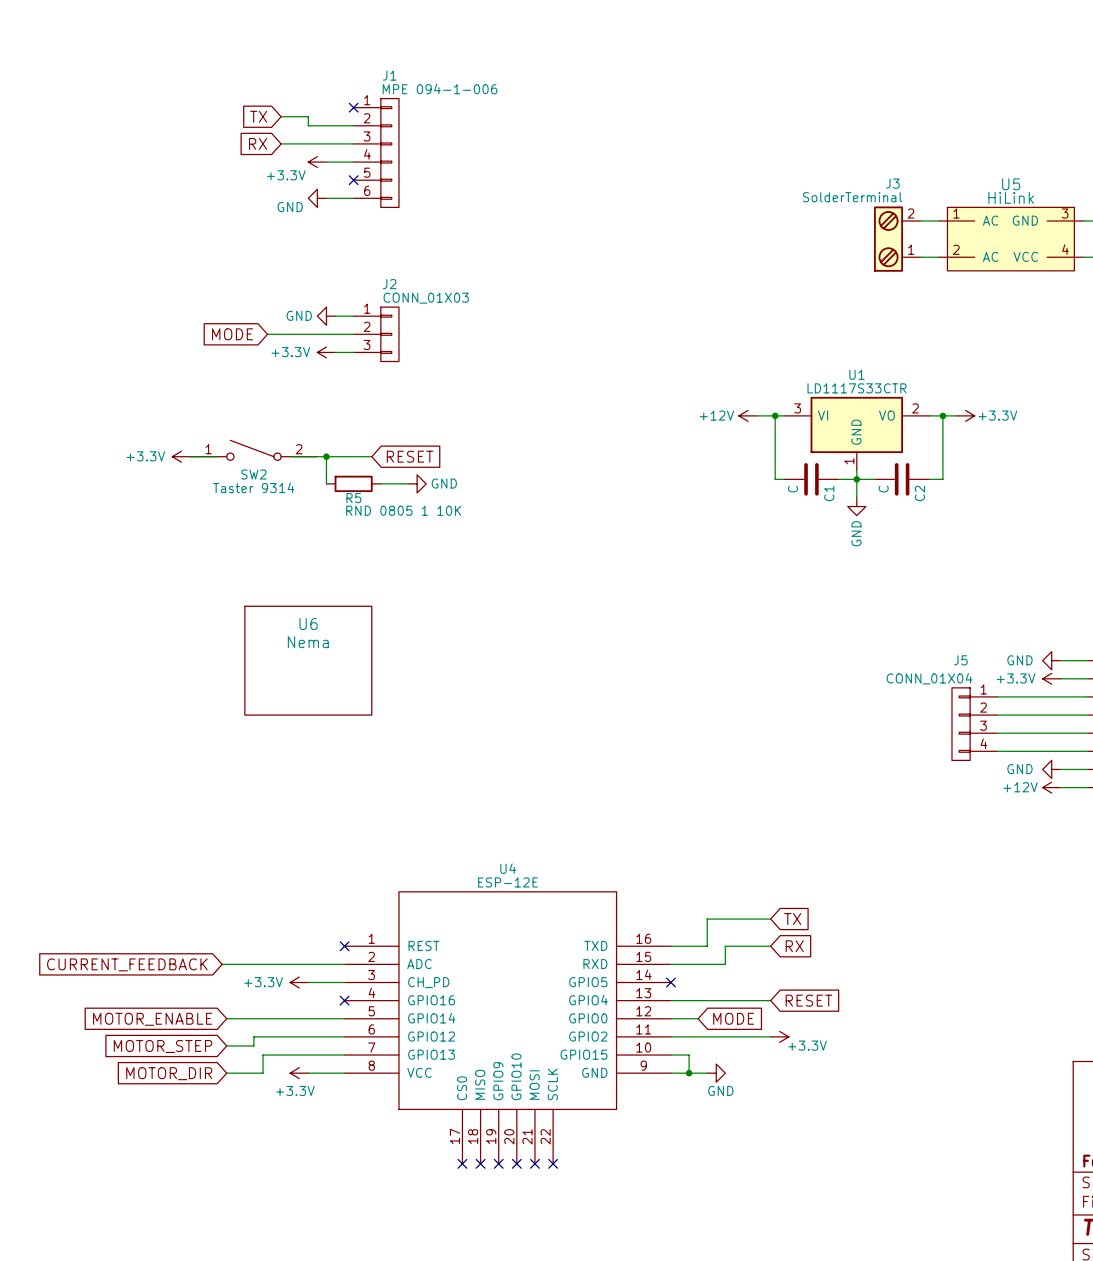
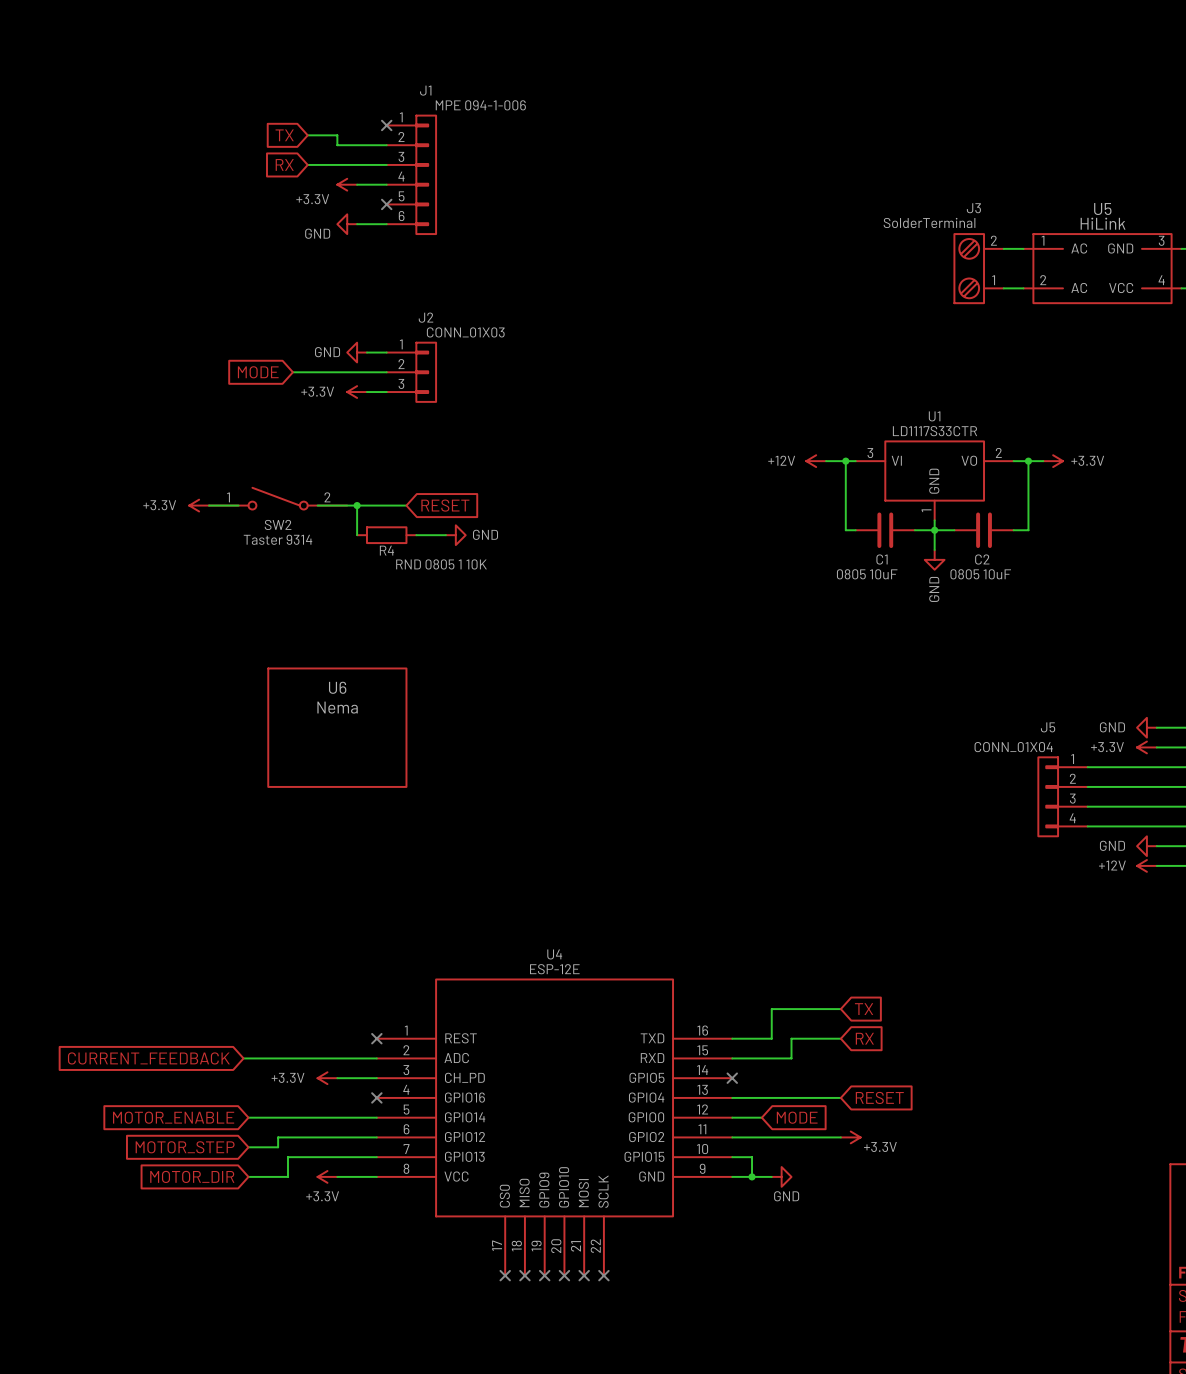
C1 value: C (793, 489) -> 0805 10uF (867, 574)
C2 value: C (883, 489) -> 0805 10uF (980, 574)
C1 name rotation: 0° (829, 493) -> 90° clockwise (882, 559)
C2 name rotation: 0° (919, 493) -> 90° clockwise (982, 559)
R5 name: R5 (353, 498) -> R4 (386, 550)

